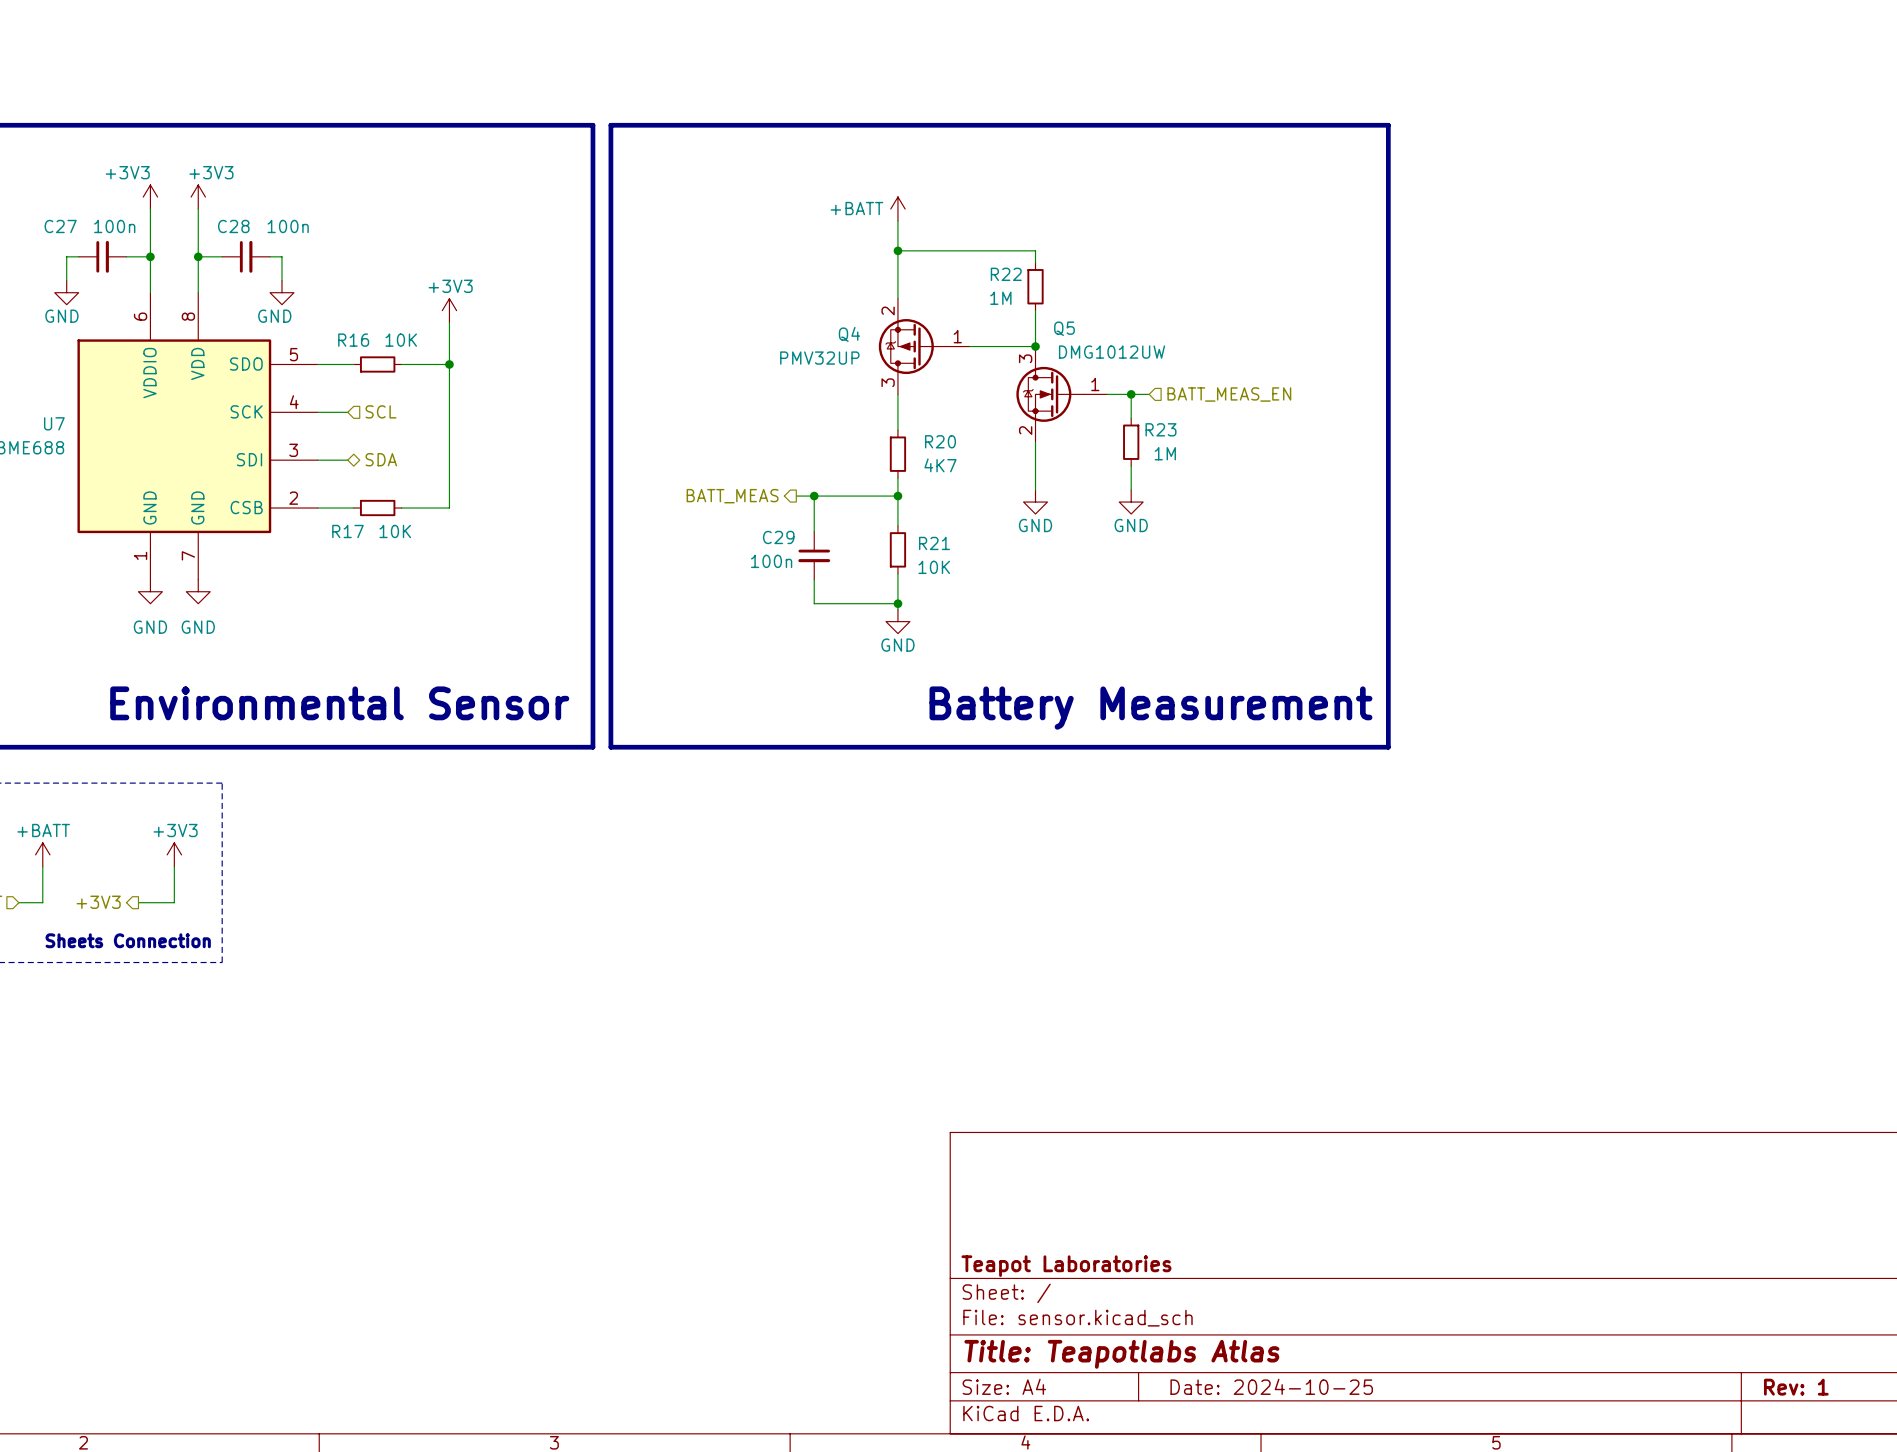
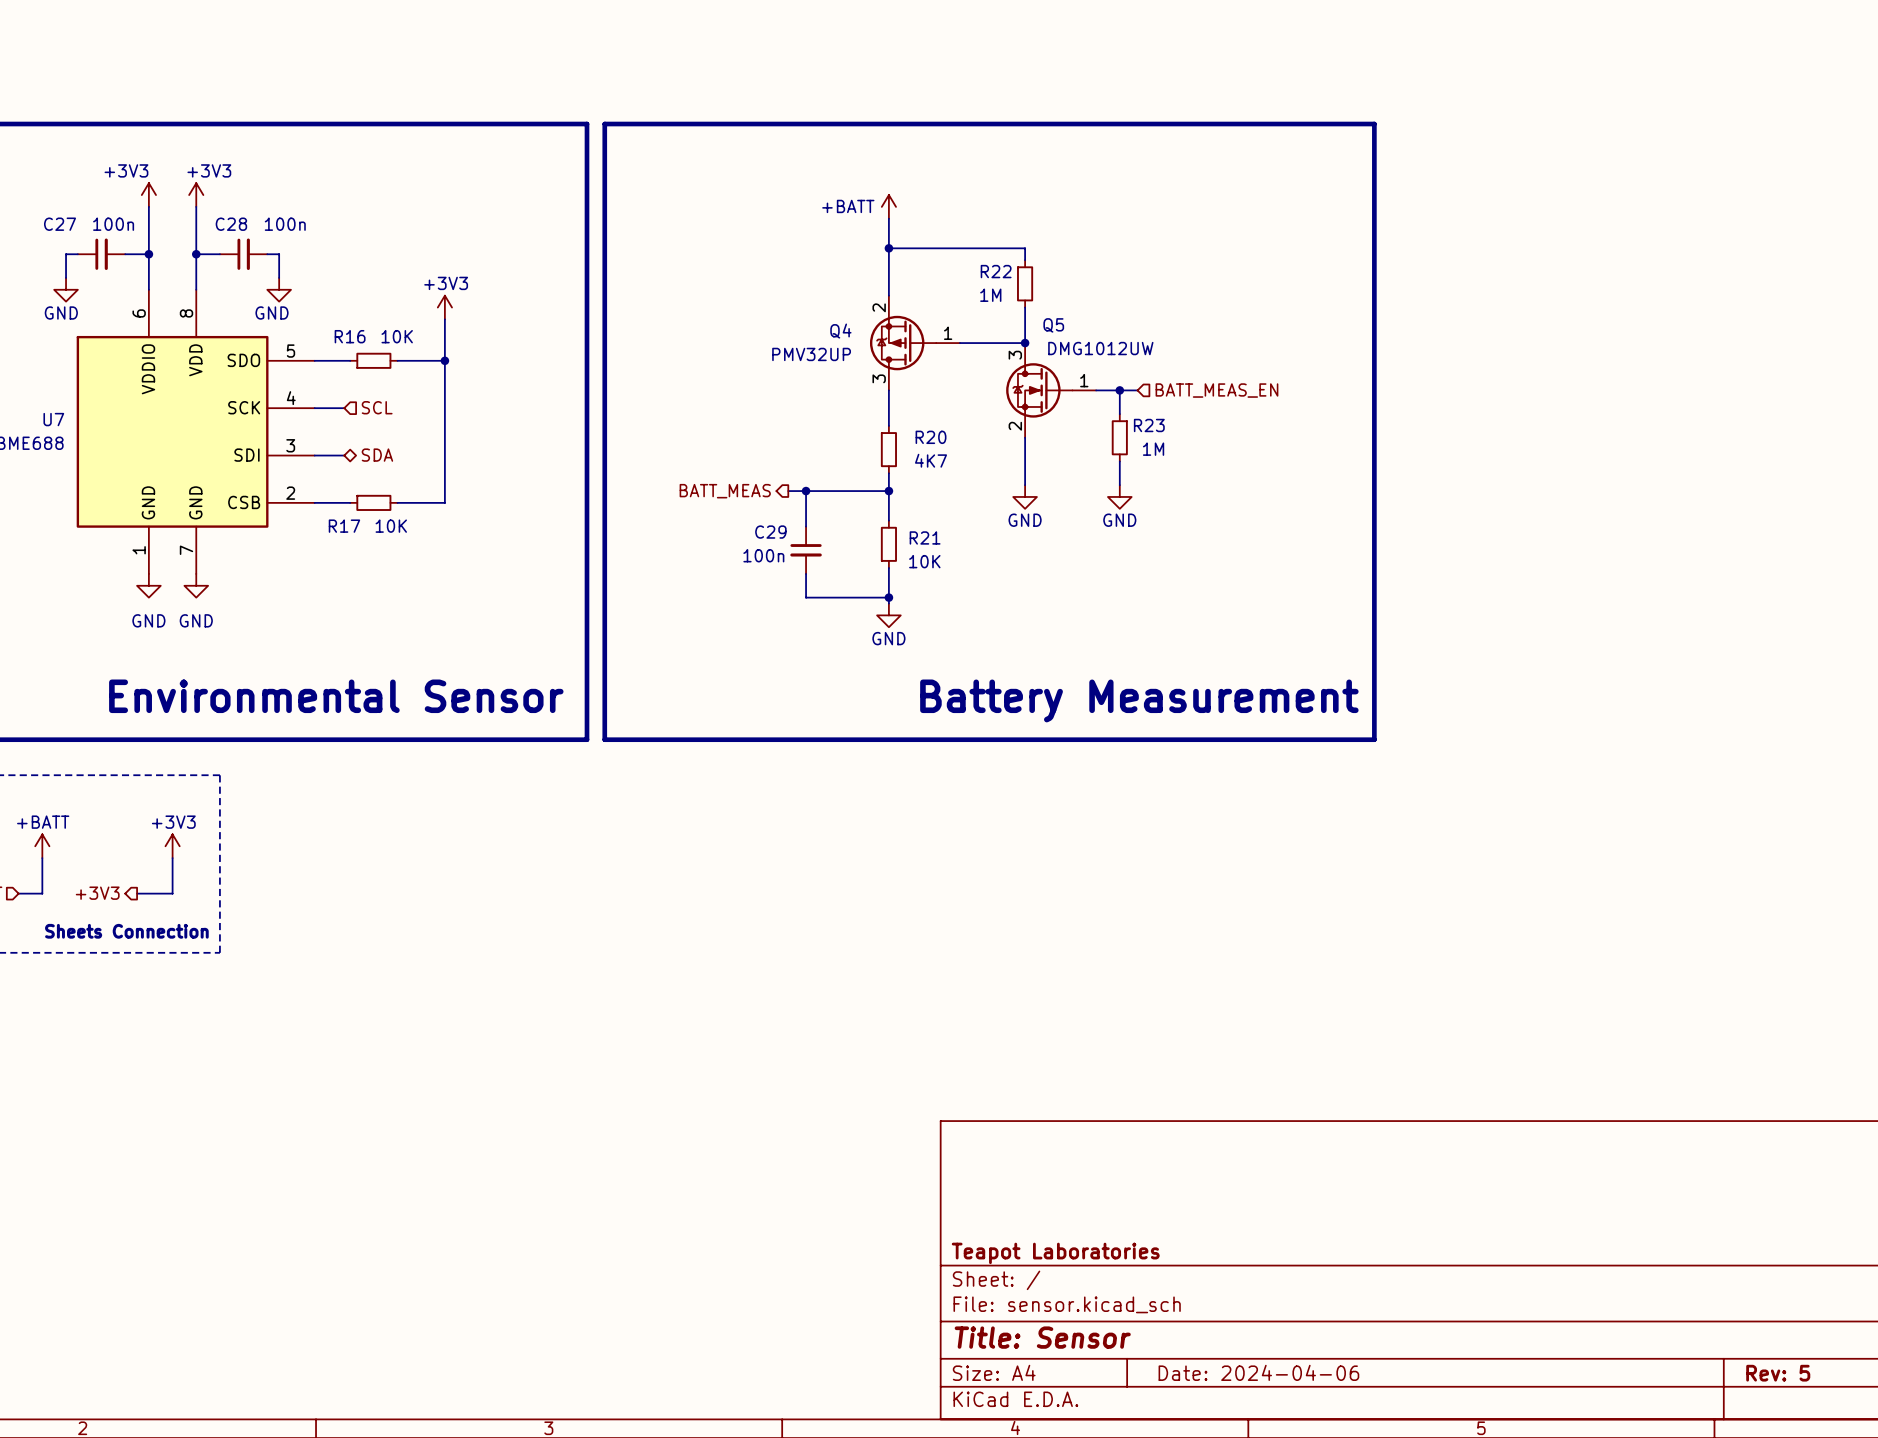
title block: Title: Teapotlabs Atlas (1121, 1354) -> Title: Sensor (1042, 1337)
title block: Date: 2024-10-25 (1271, 1386) -> Date: 2024-04-06 (1258, 1372)
title block: Rev: 1 (1796, 1387) -> Rev: 5 (1778, 1373)

